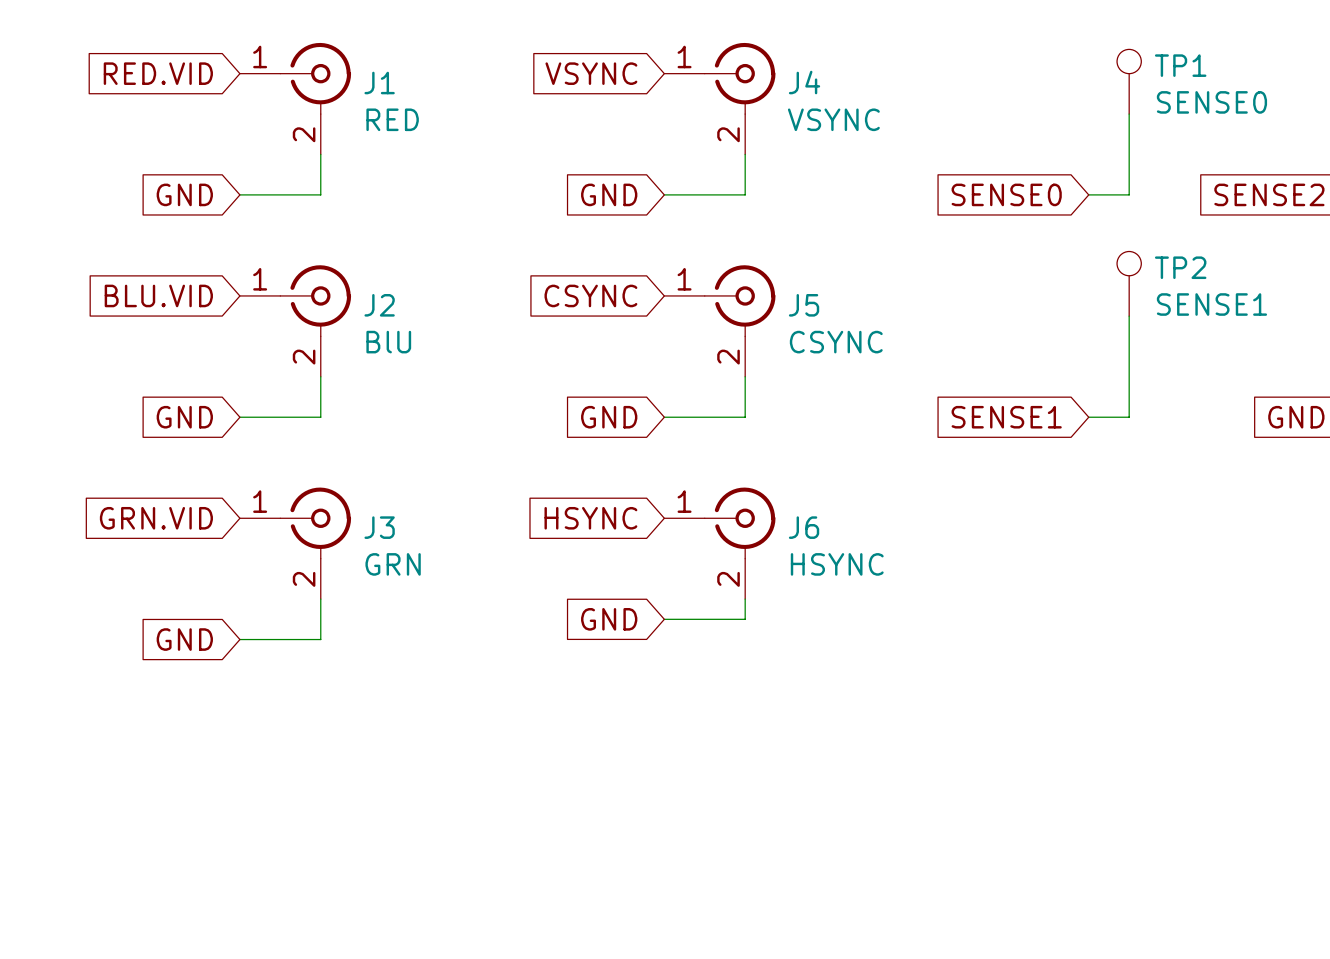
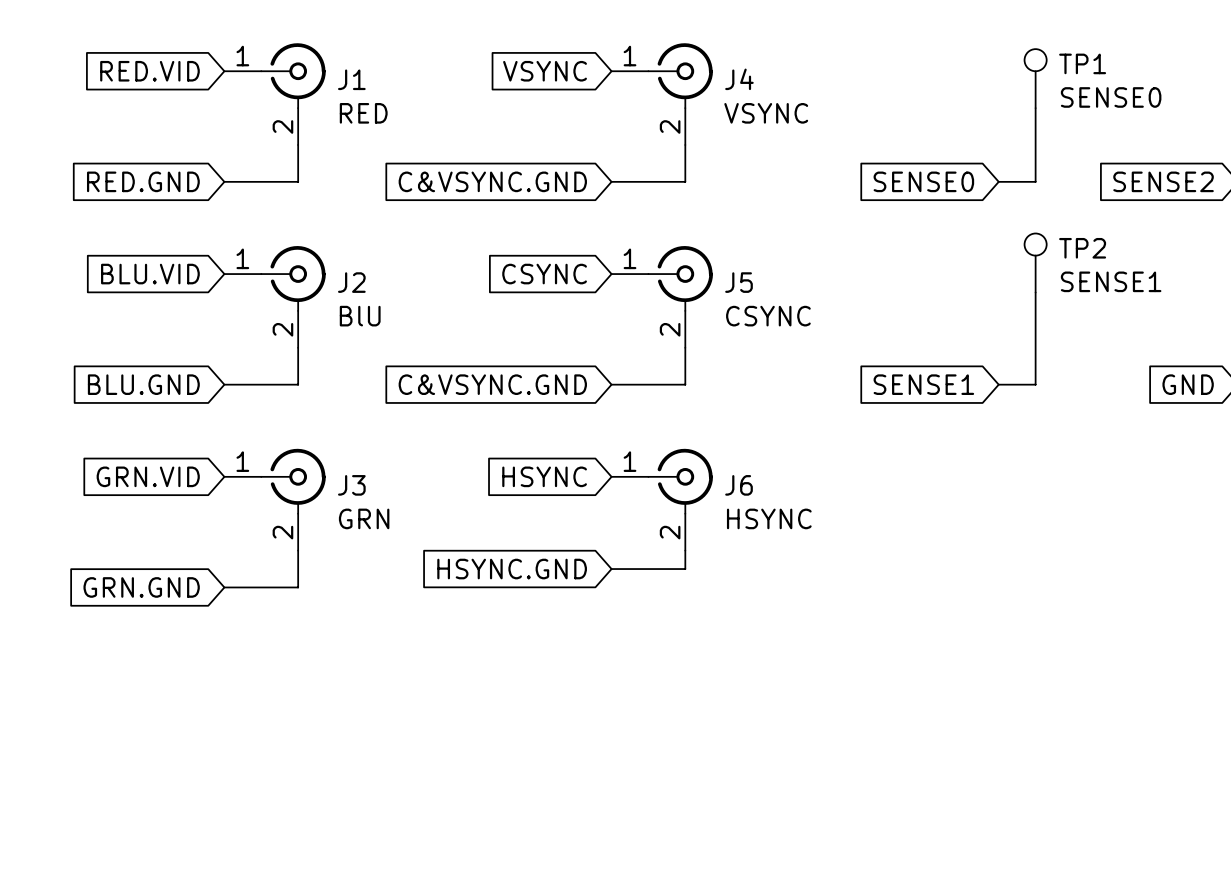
global label: GND (184, 194) -> RED.GND (143, 181)
global label: GND (609, 194) -> C&VSYNC.GND (492, 181)
global label: GND (184, 417) -> BLU.GND (143, 384)
global label: GND (609, 417) -> C&VSYNC.GND (492, 384)
global label: GND (609, 619) -> HSYNC.GND (512, 569)
global label: GND (184, 639) -> GRN.GND (141, 587)

